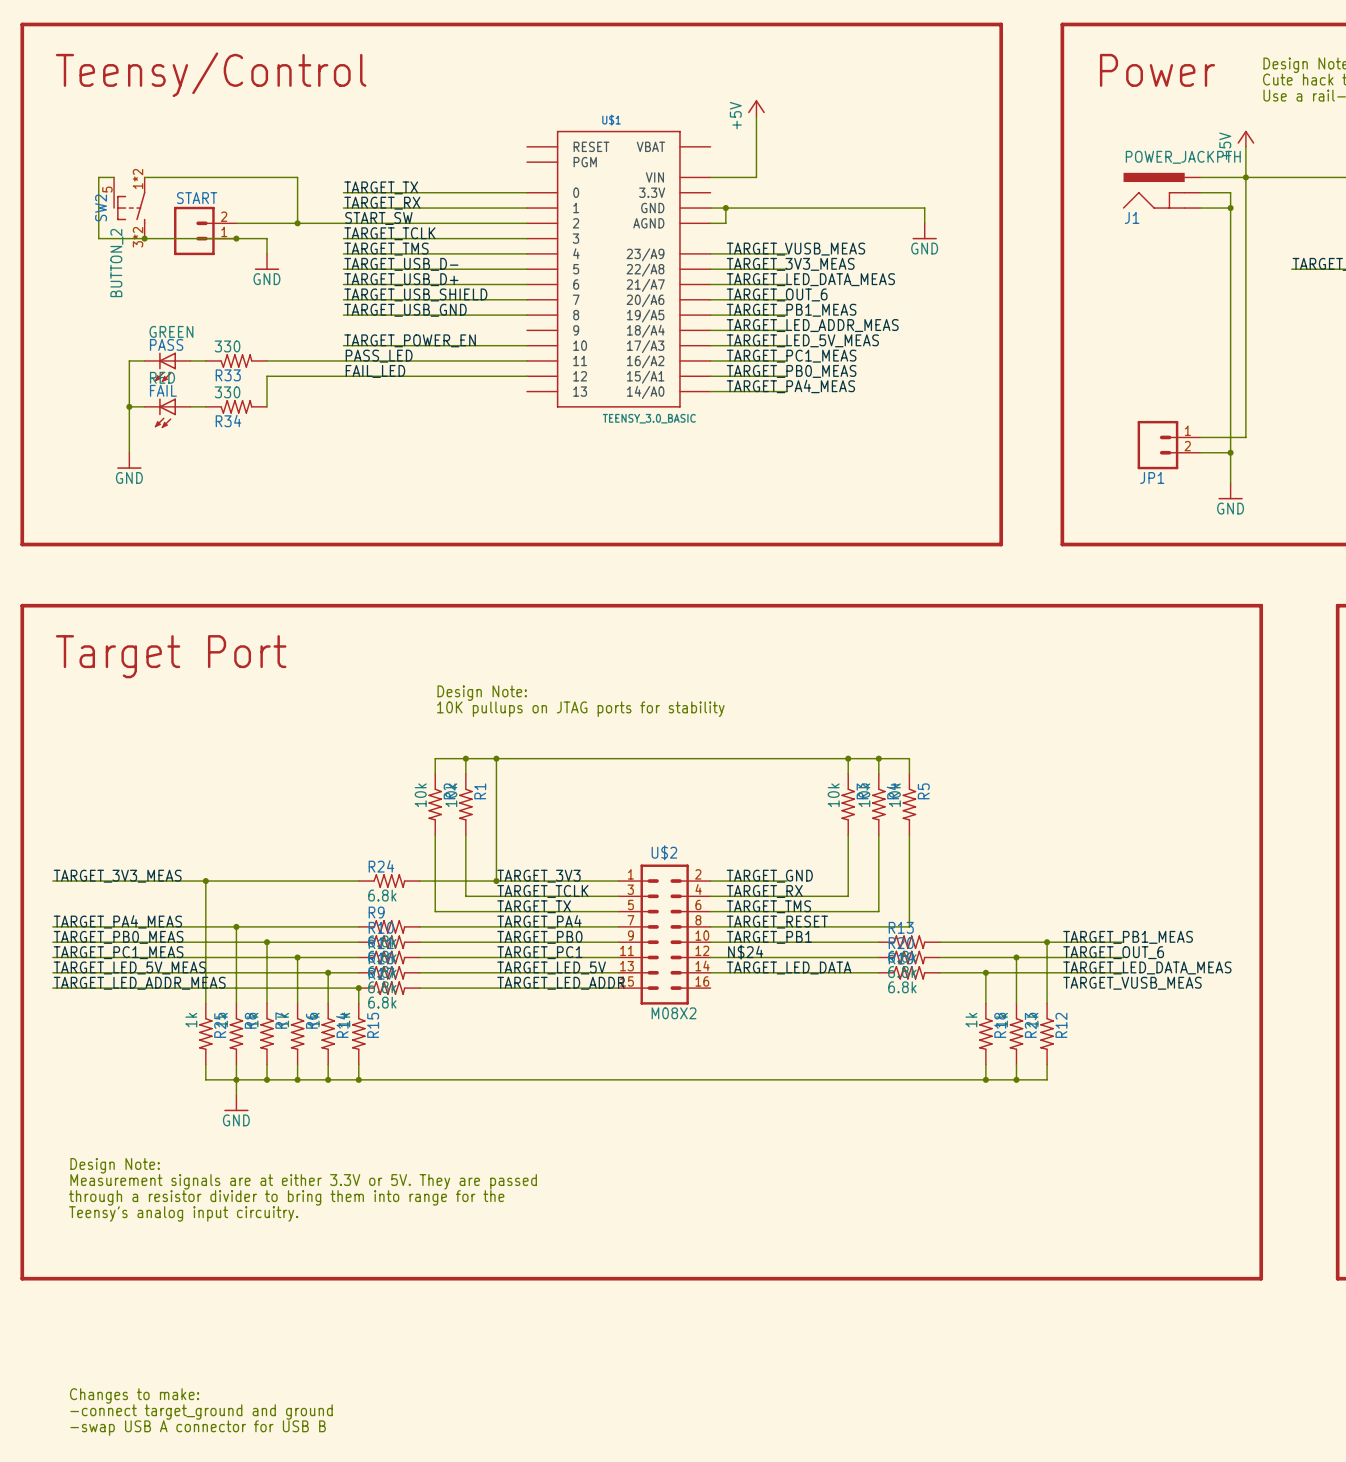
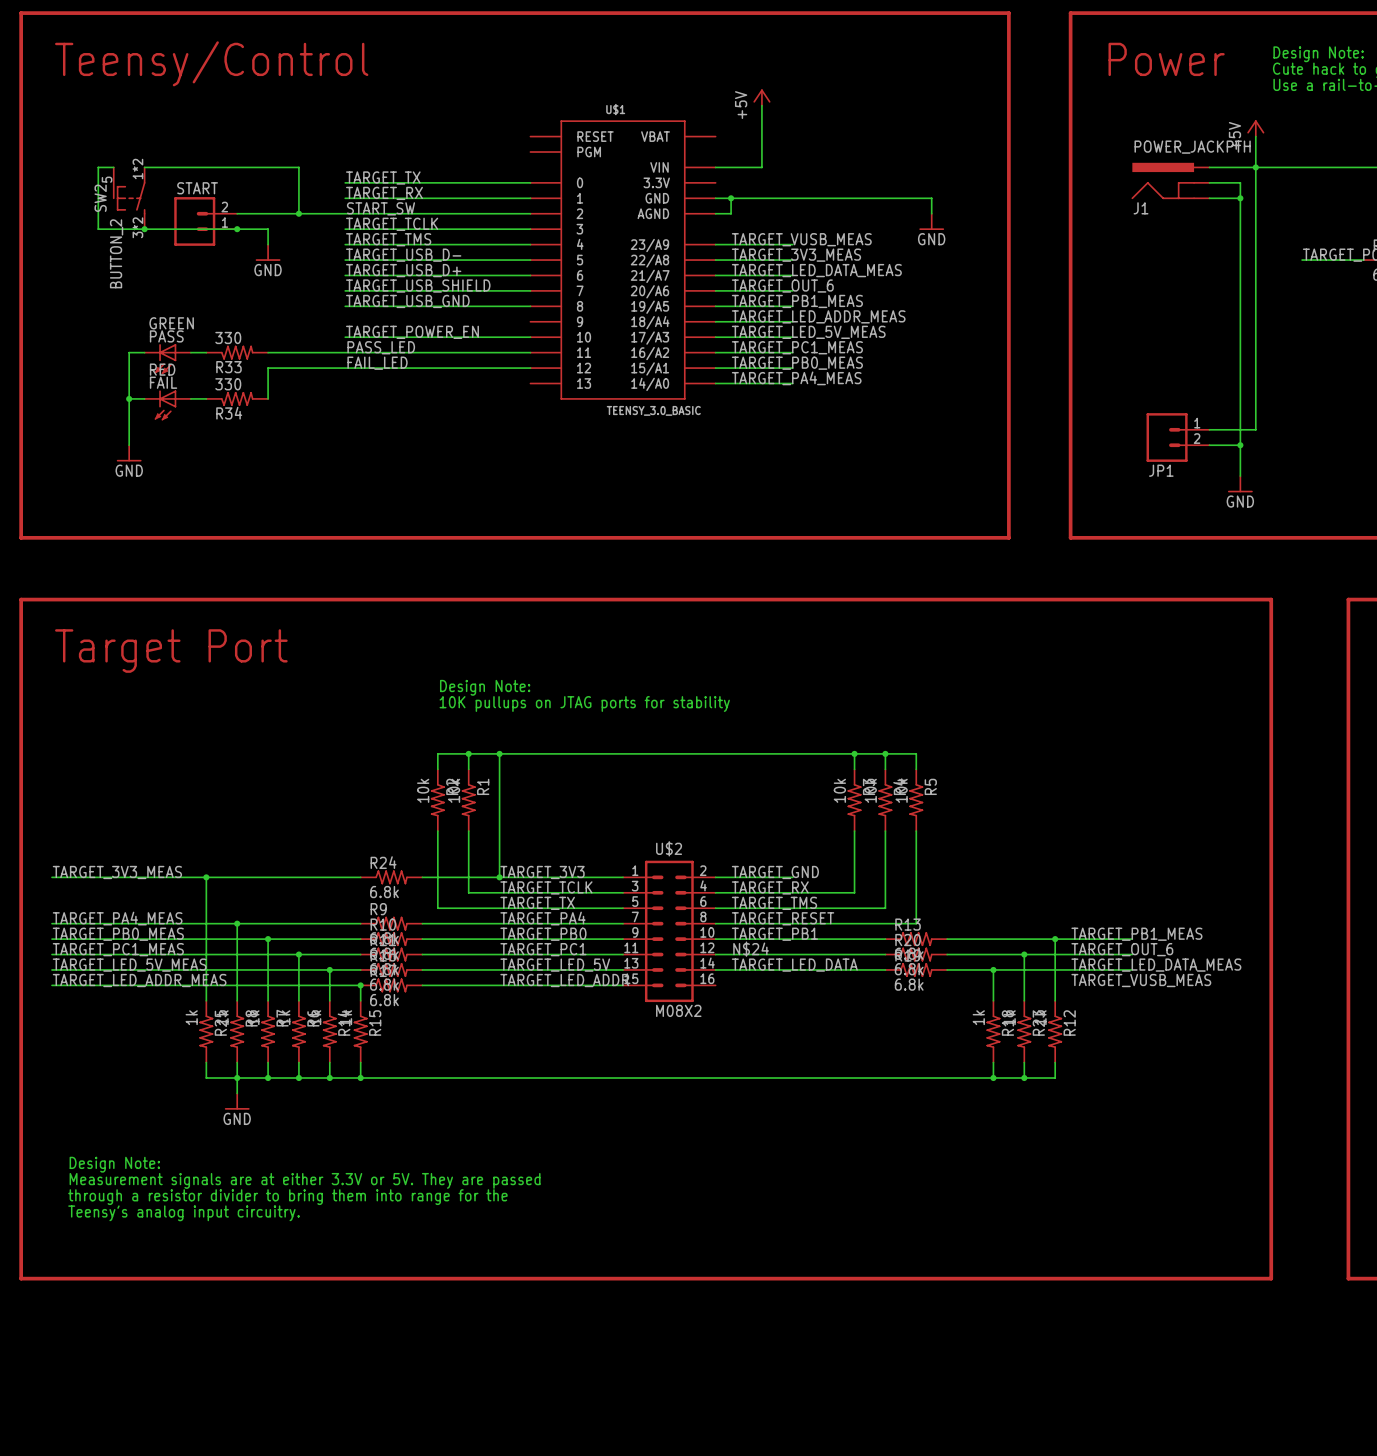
text: Changes to make: (134, 1395) -> none
text: -connect target_ground and ground (201, 1412) -> none
text: -swap USB A connector for USB B (198, 1428) -> none

